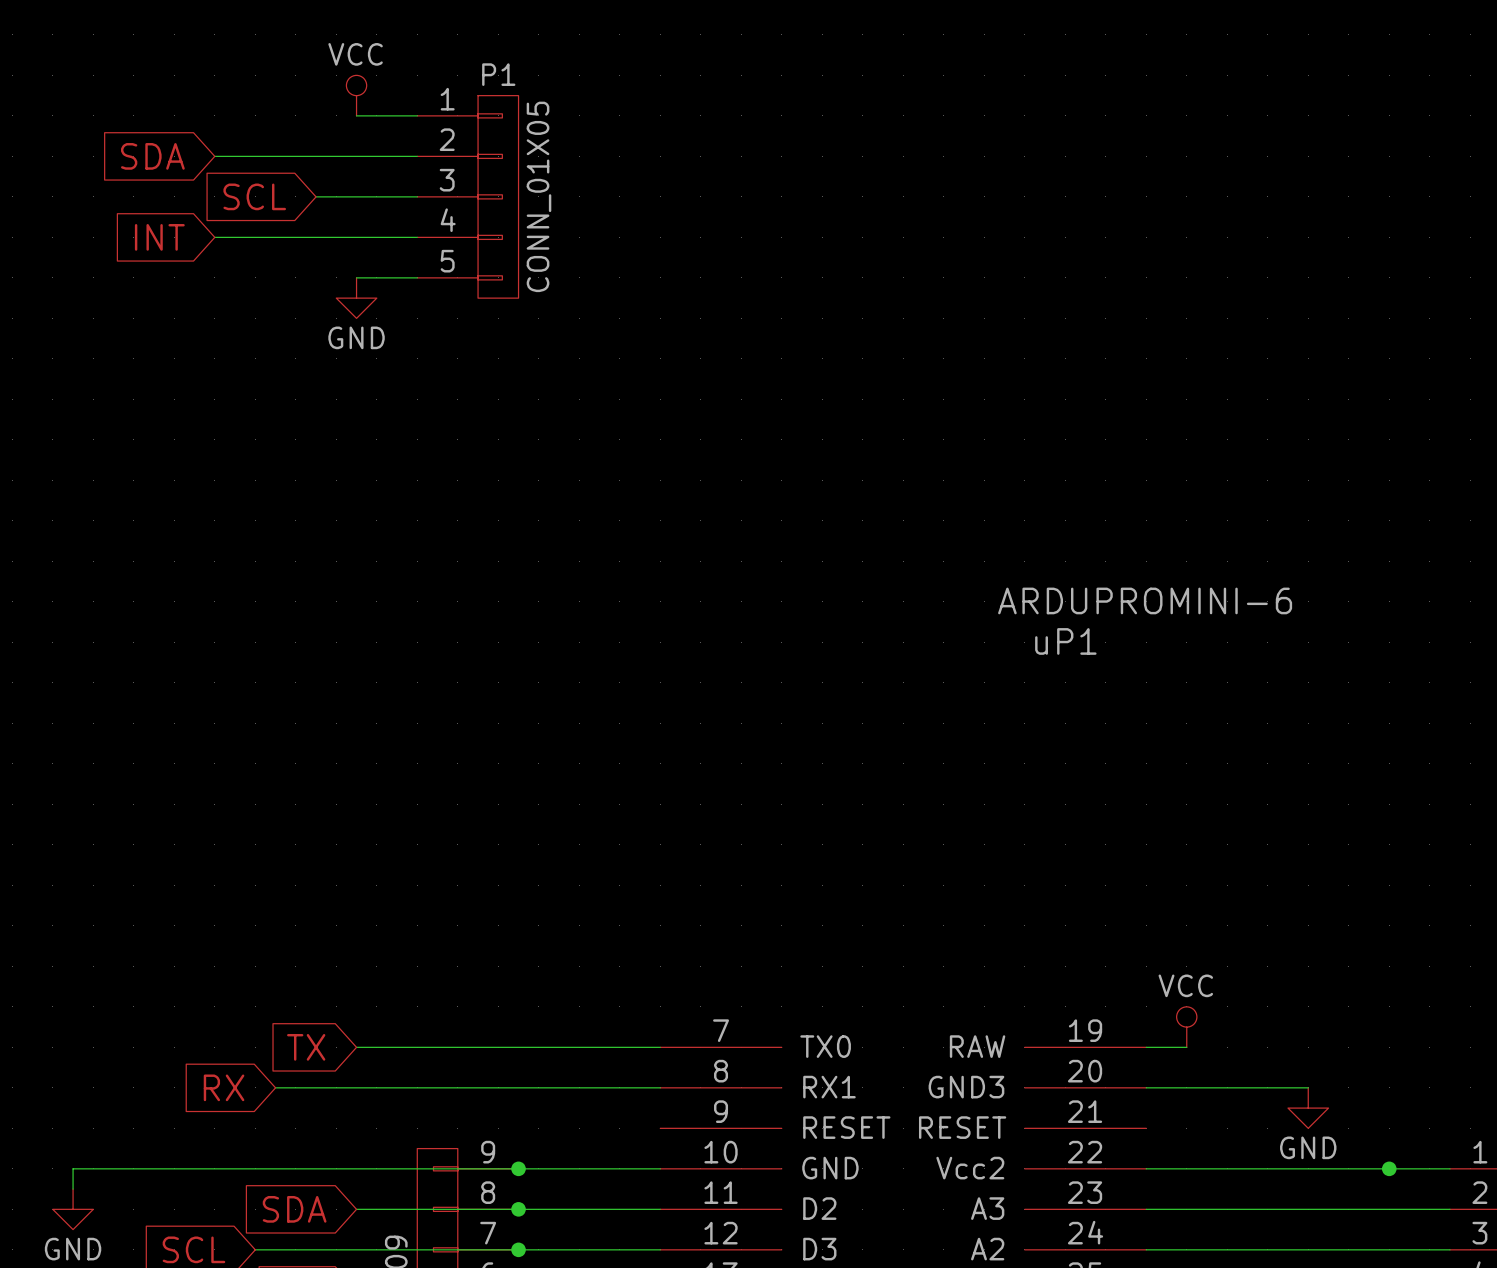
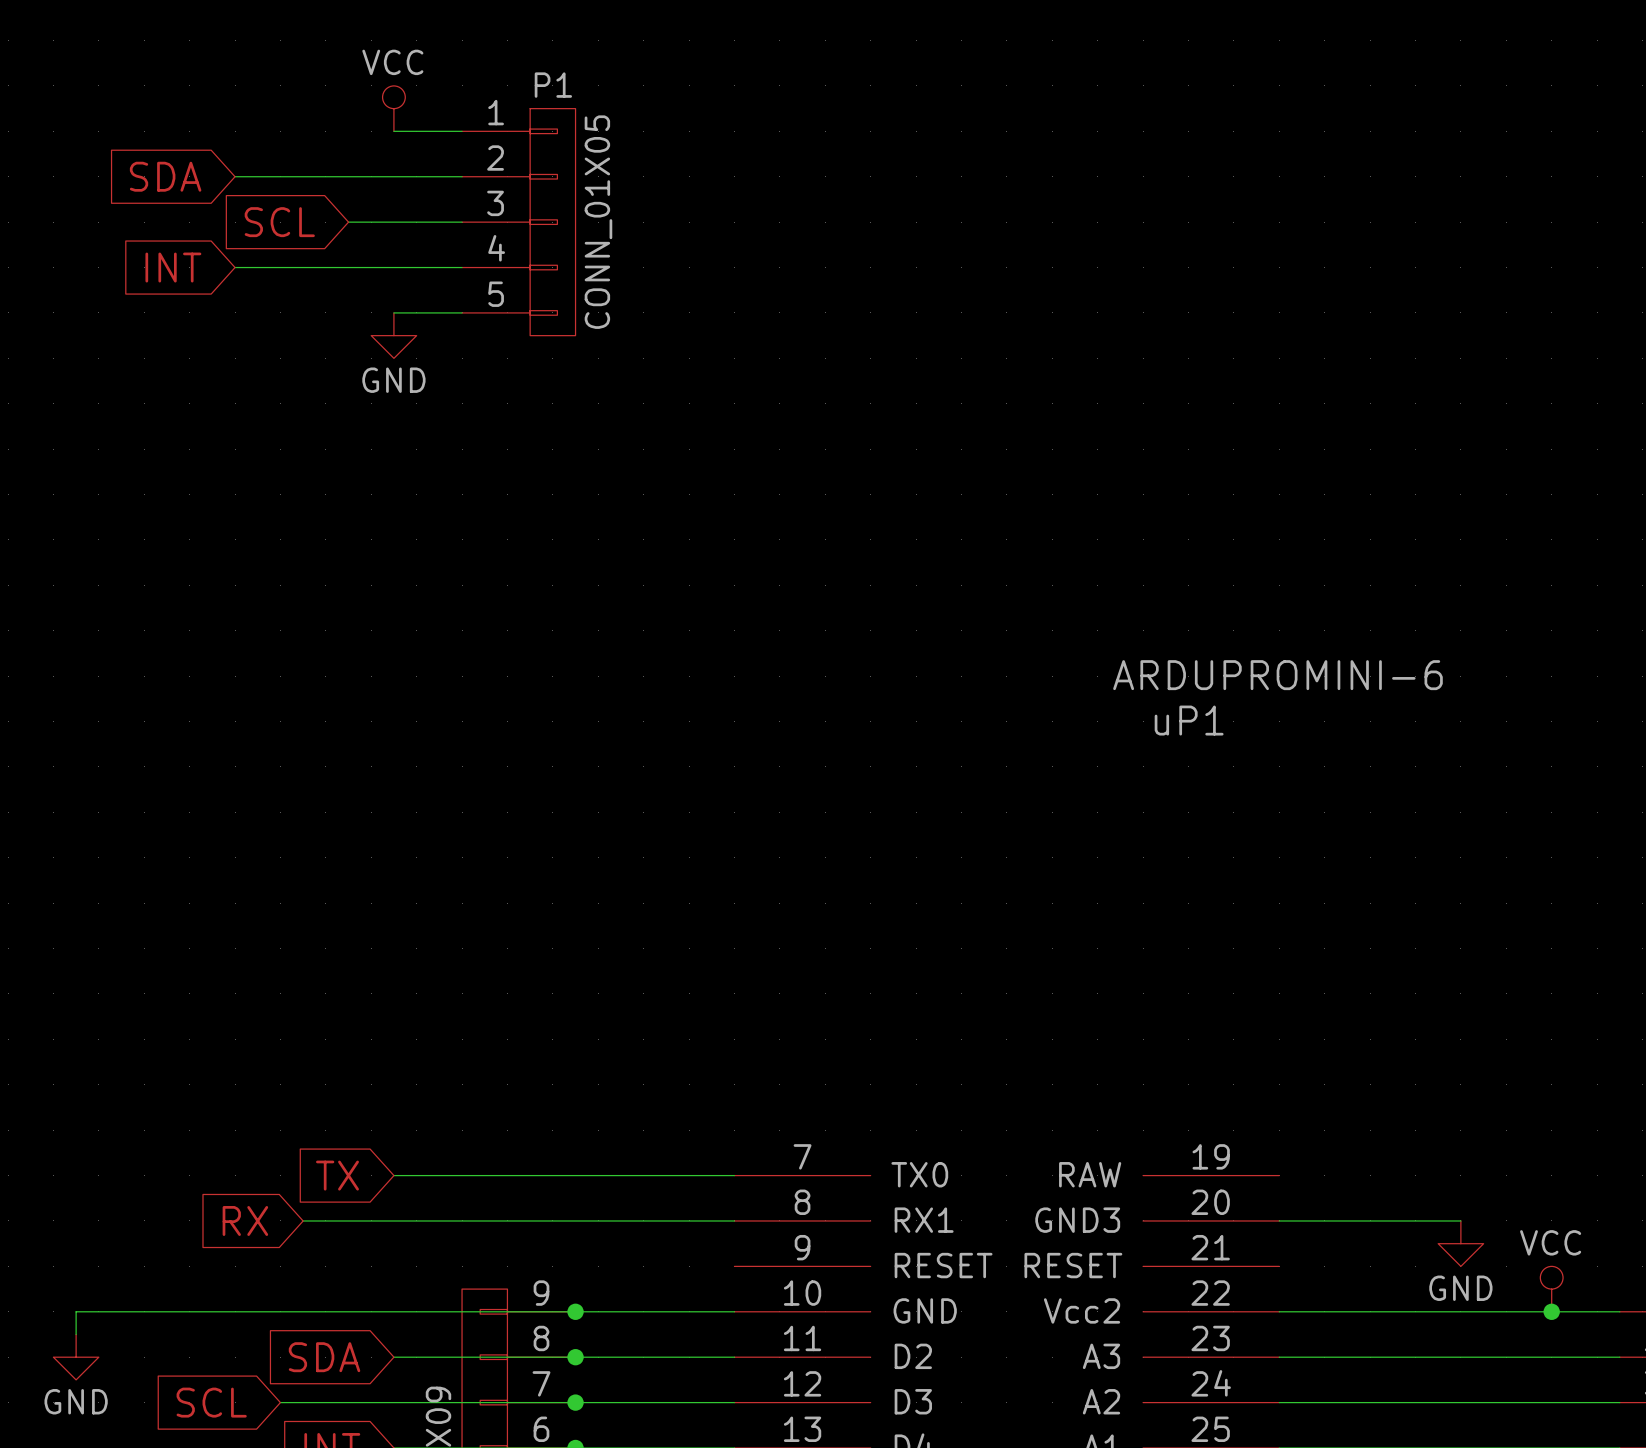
power symbol position: VCC (1186, 1027) -> VCC (1551, 1289)
wire: (1146, 1047) (1186, 1047) -> none

